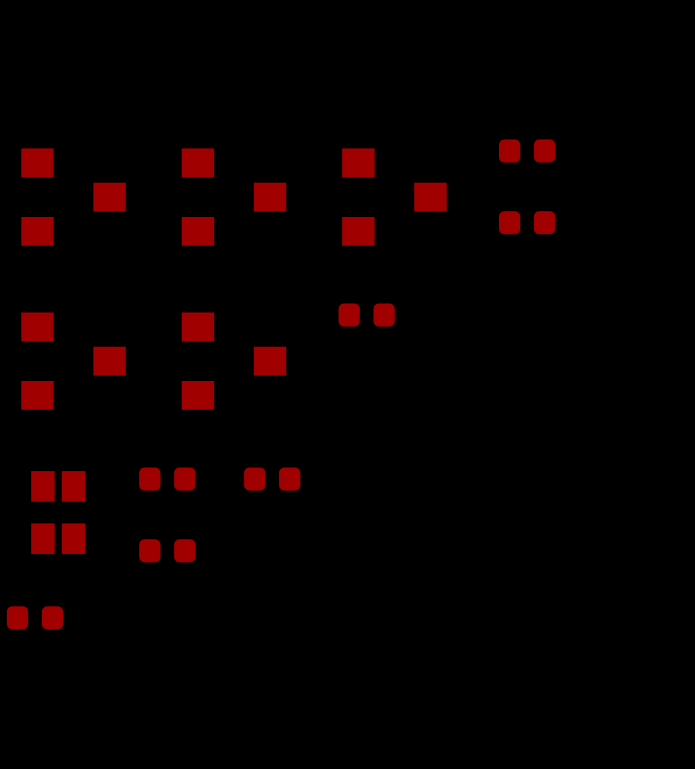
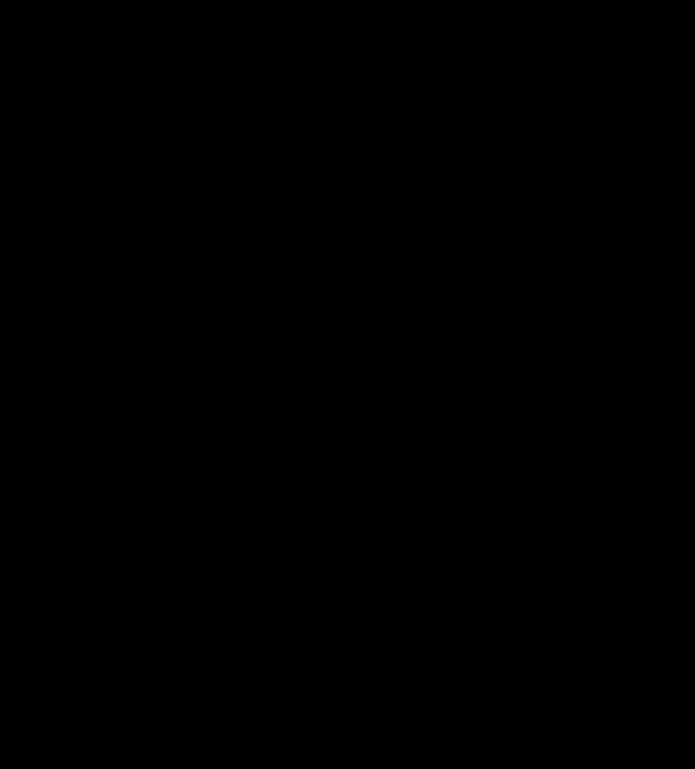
part: (527, 150) -> none
part: (73, 197) -> none
part: (233, 197) -> none
part: (394, 197) -> none
part: (527, 222) -> none
part: (366, 315) -> none
part: (73, 361) -> none
part: (233, 361) -> none
part: (167, 479) -> none
part: (272, 479) -> none
part: (58, 512) -> none
part: (167, 550) -> none
part: (34, 617) -> none

